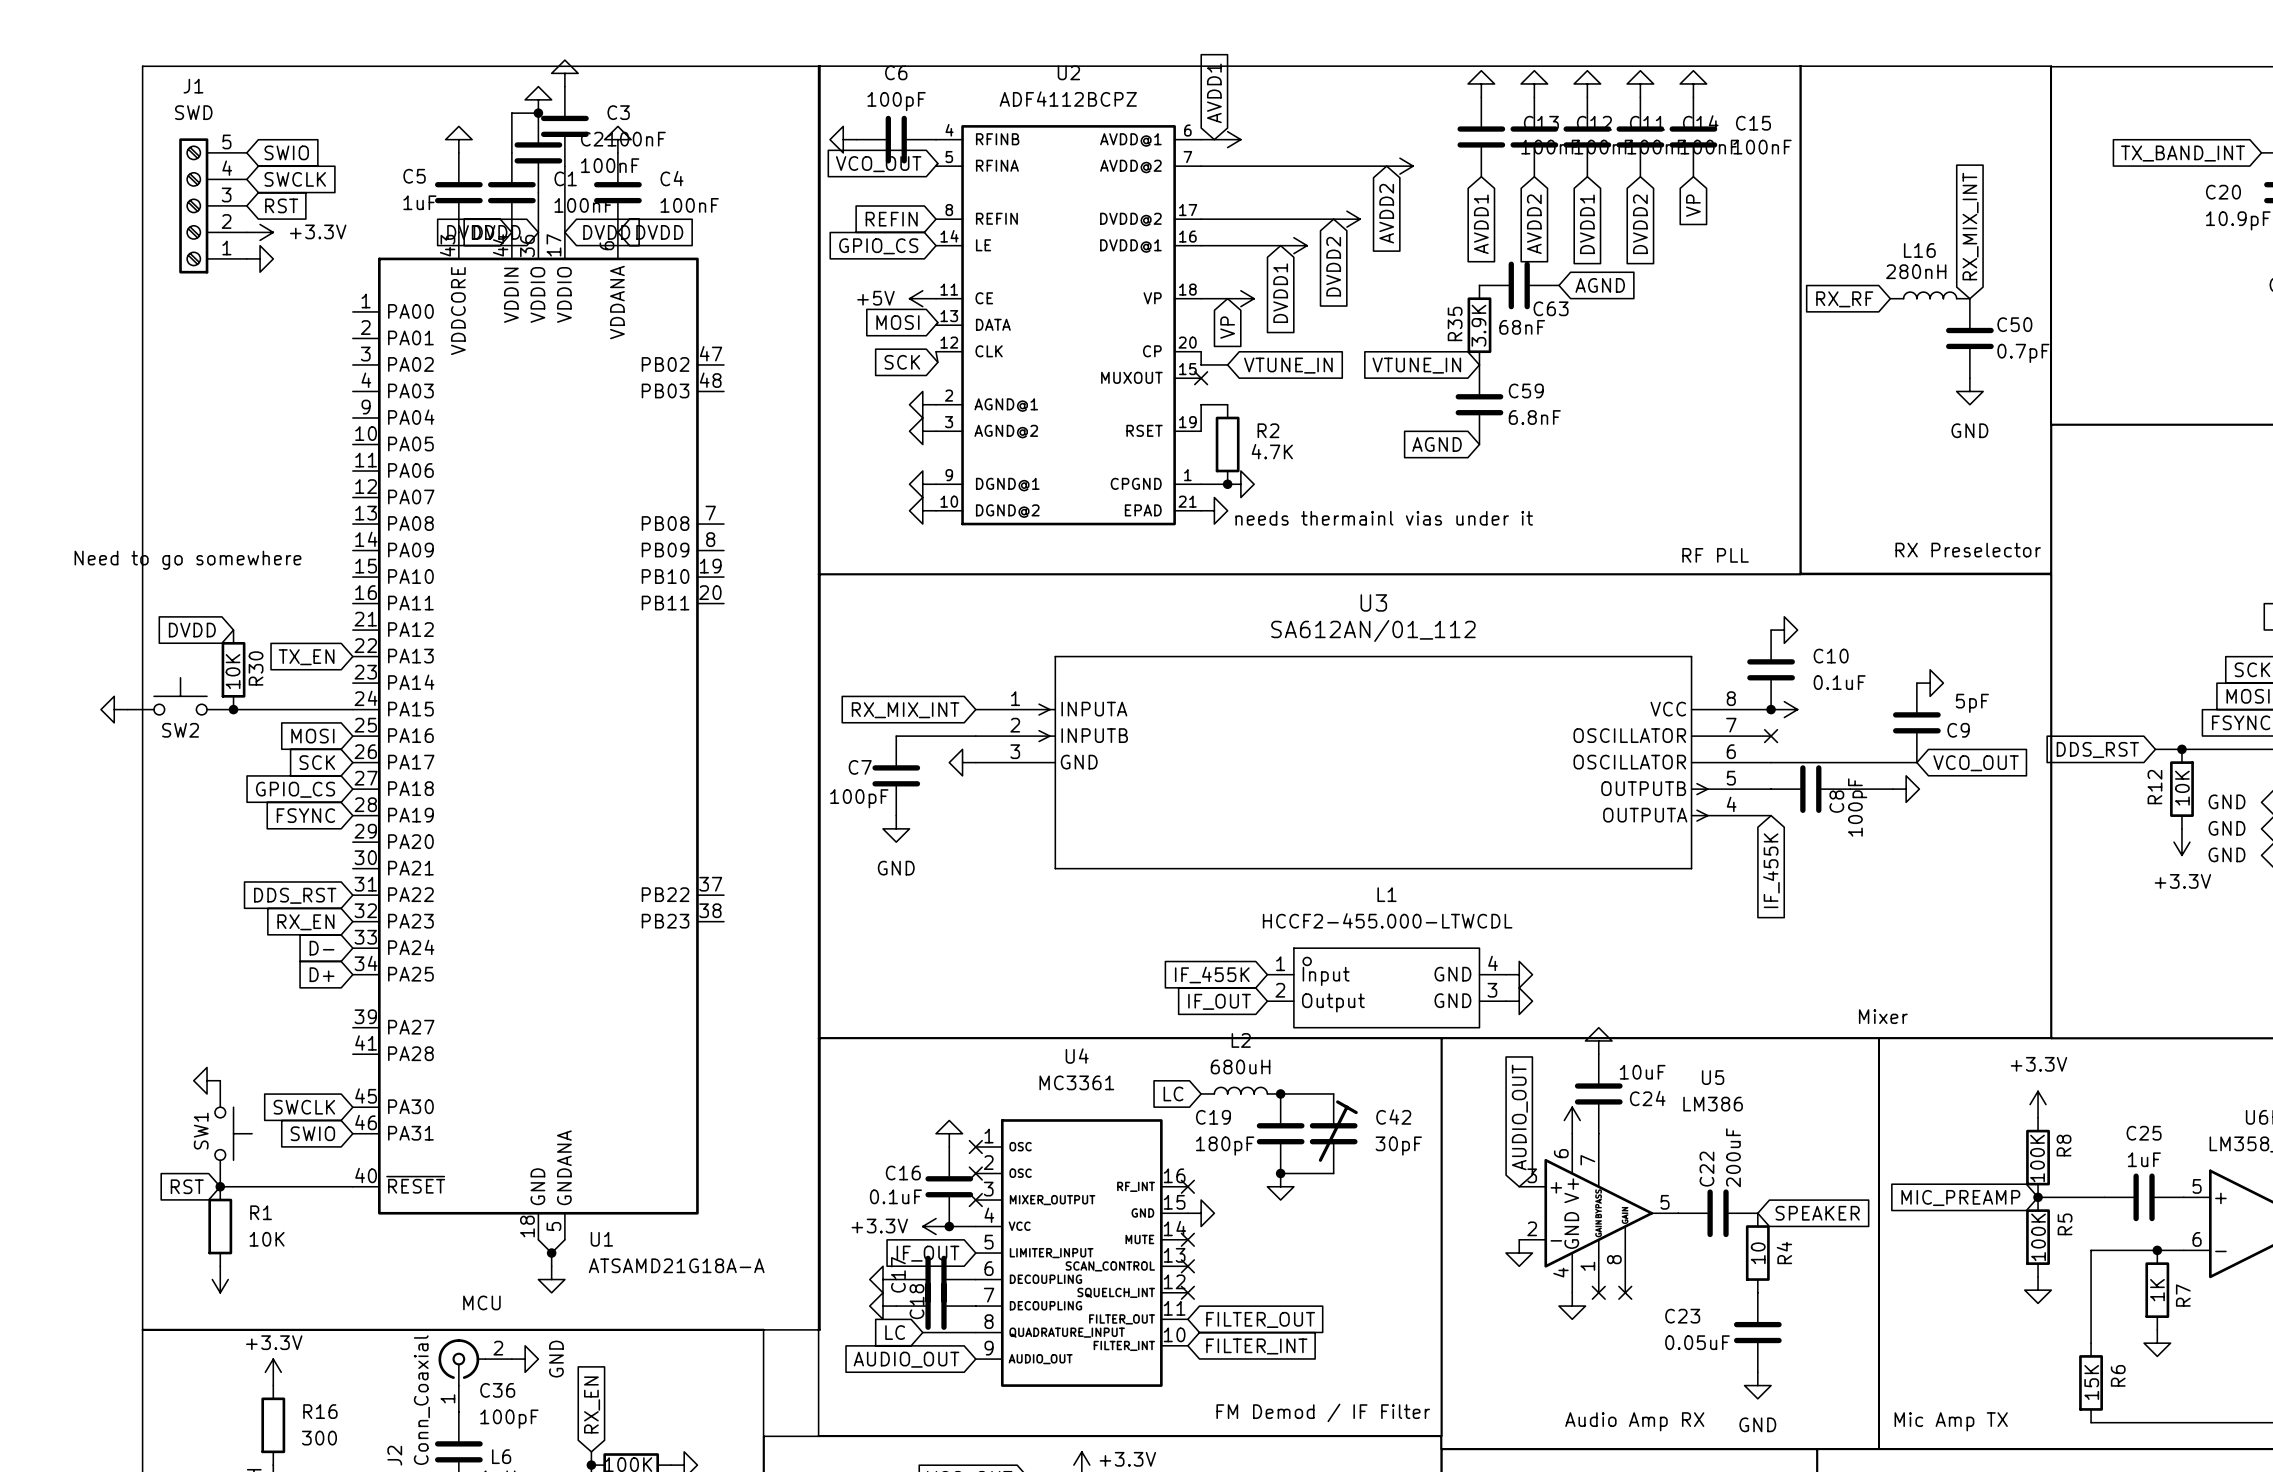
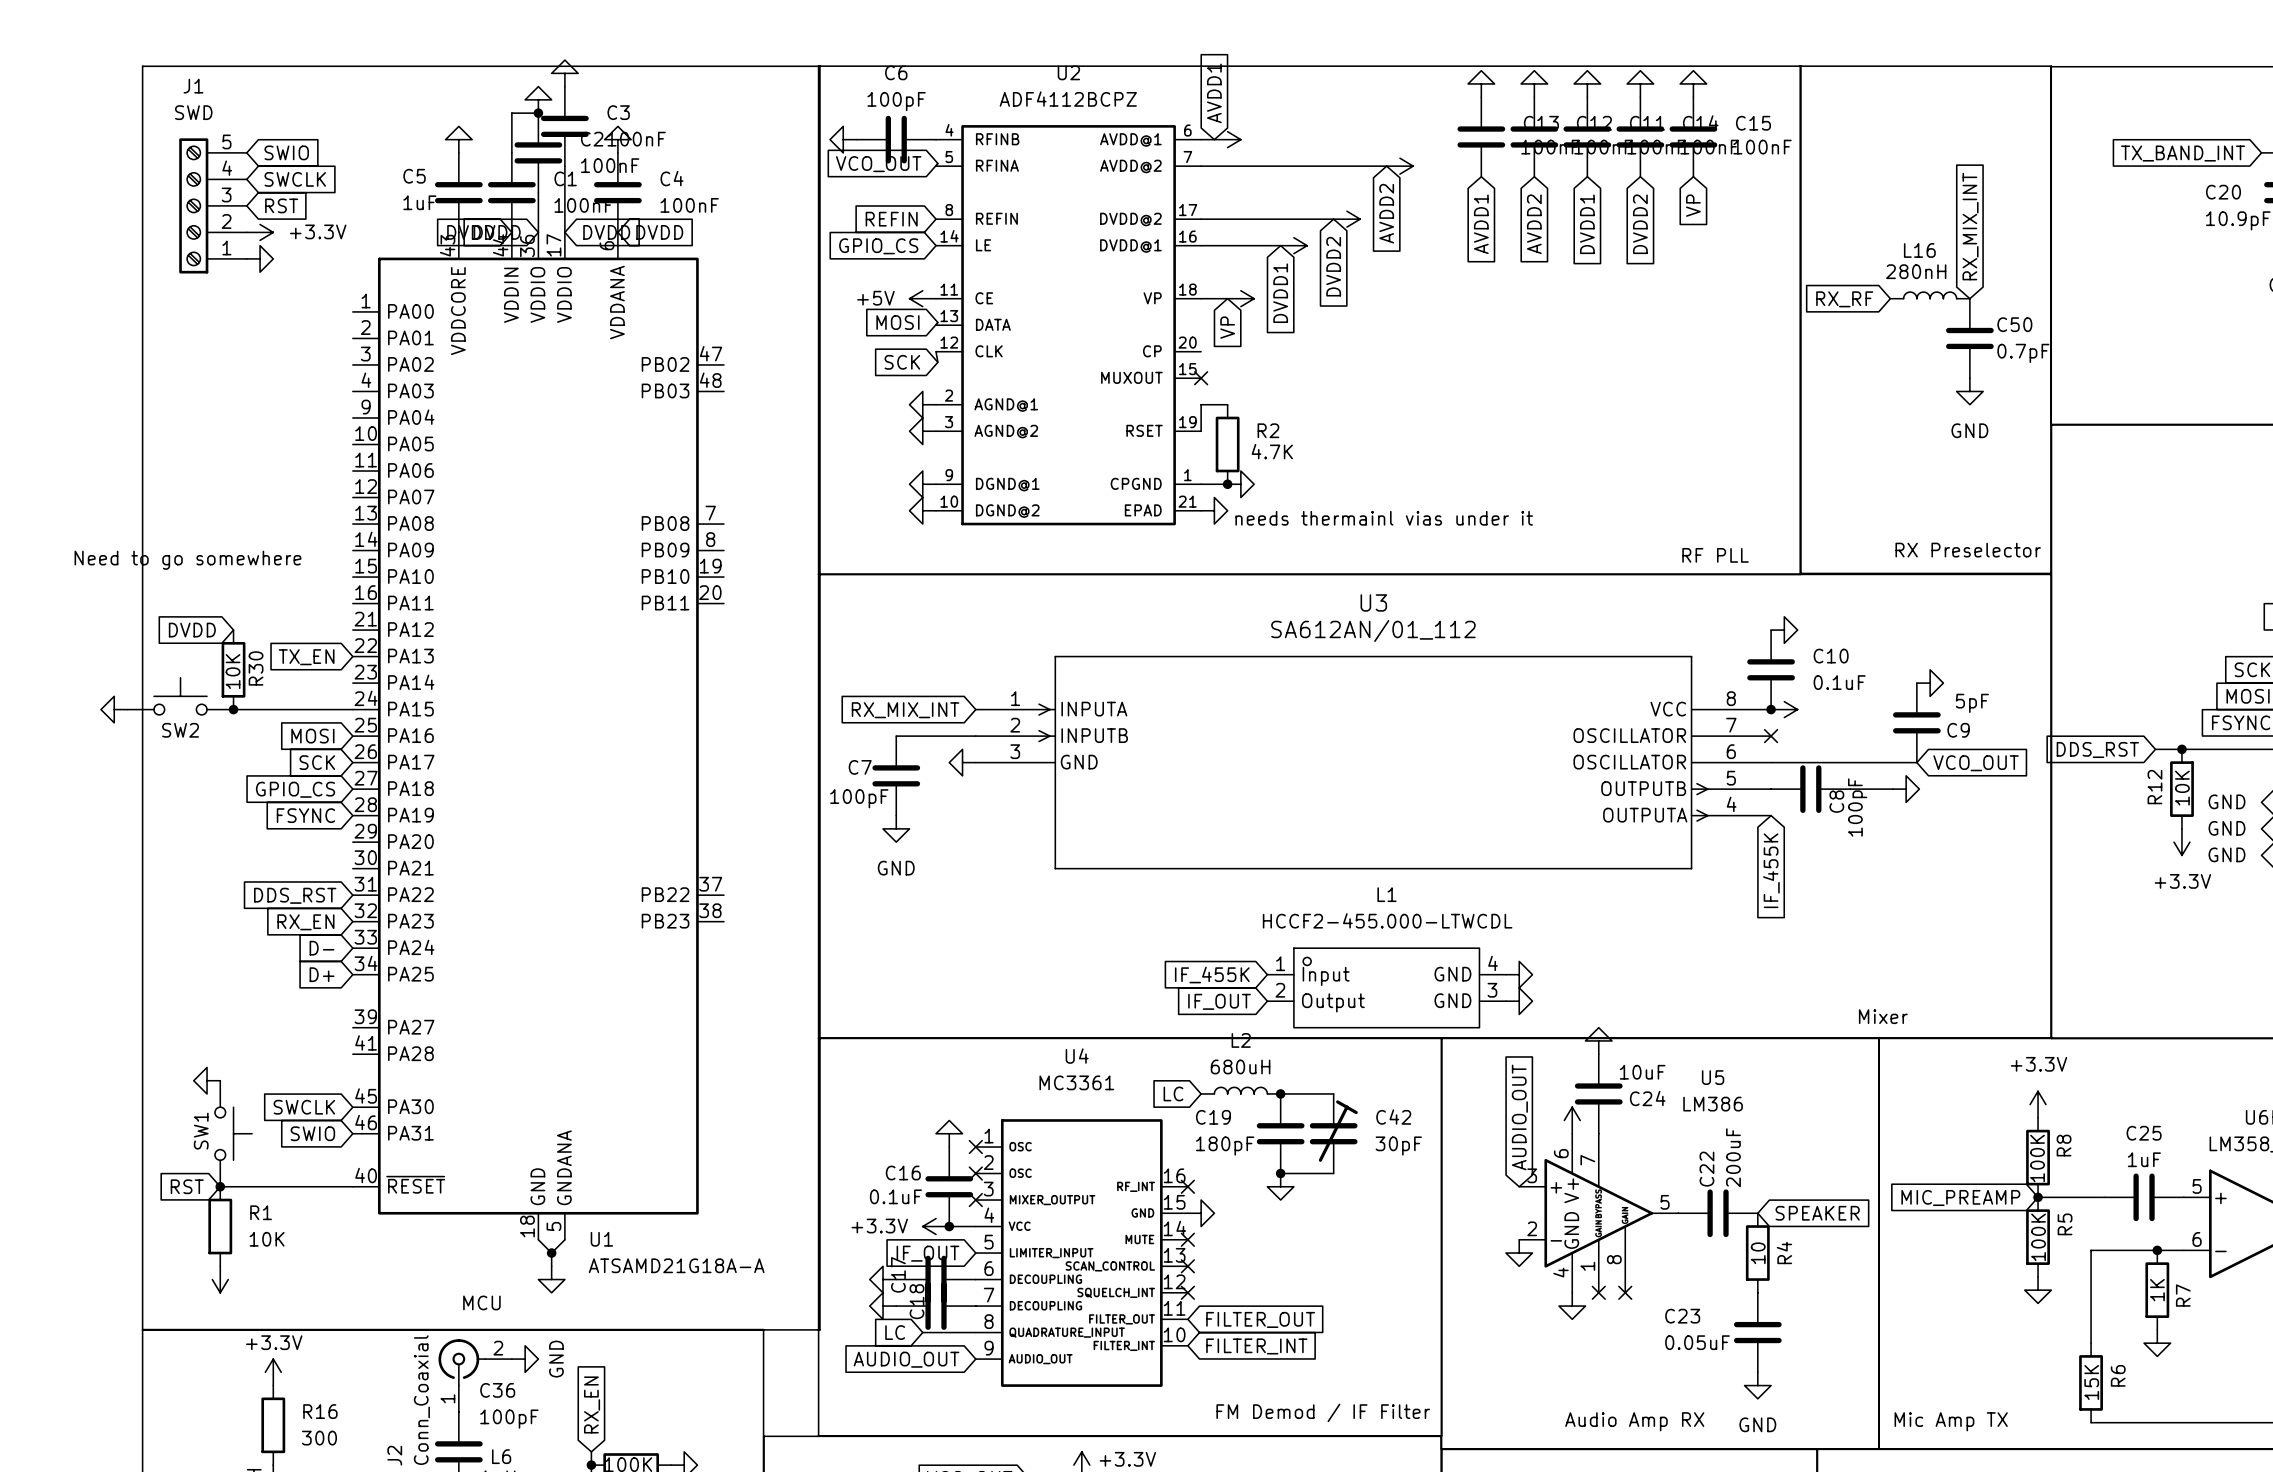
C63: 68nF (1519, 285) -> none
global label: AGND (1600, 285) -> none
R35: 3.9K (1479, 325) -> none
wire: (1201, 351) (1201, 364) (1227, 364) -> none
global label: VTUNE_IN (1288, 365) -> none
global label: VTUNE_IN (1416, 365) -> none
C59: 6.8nF (1479, 404) -> none
global label: AGND (1437, 444) -> none

